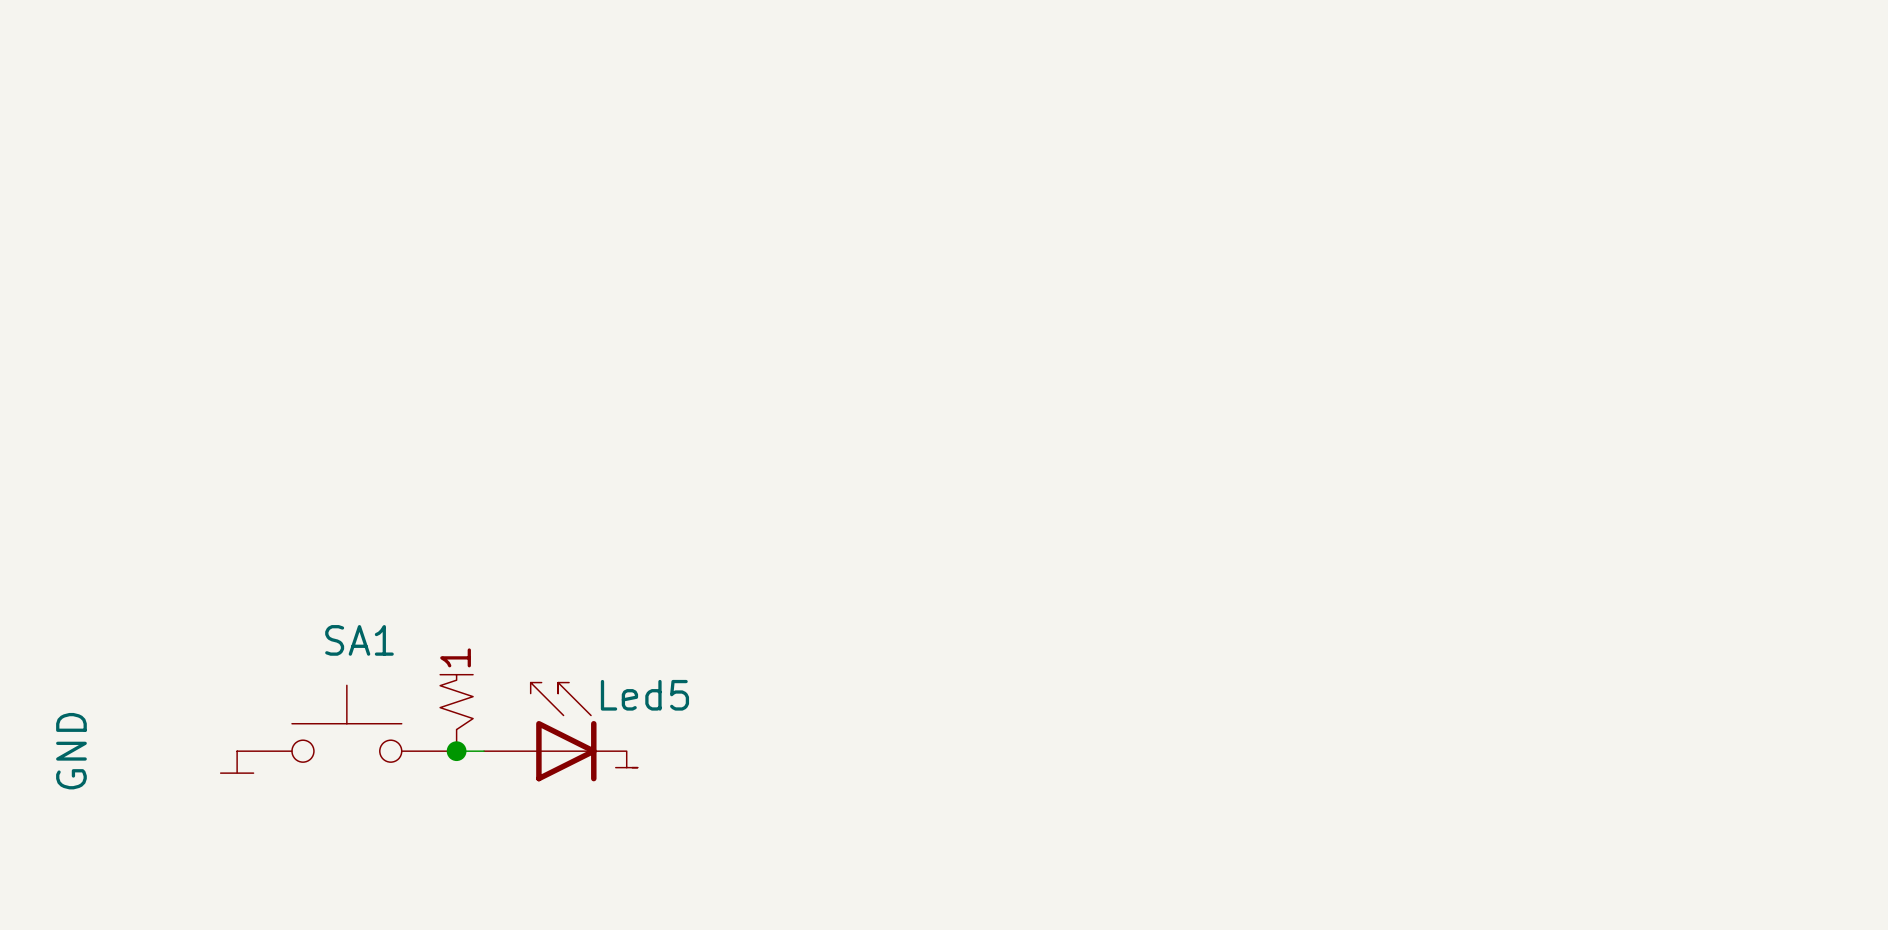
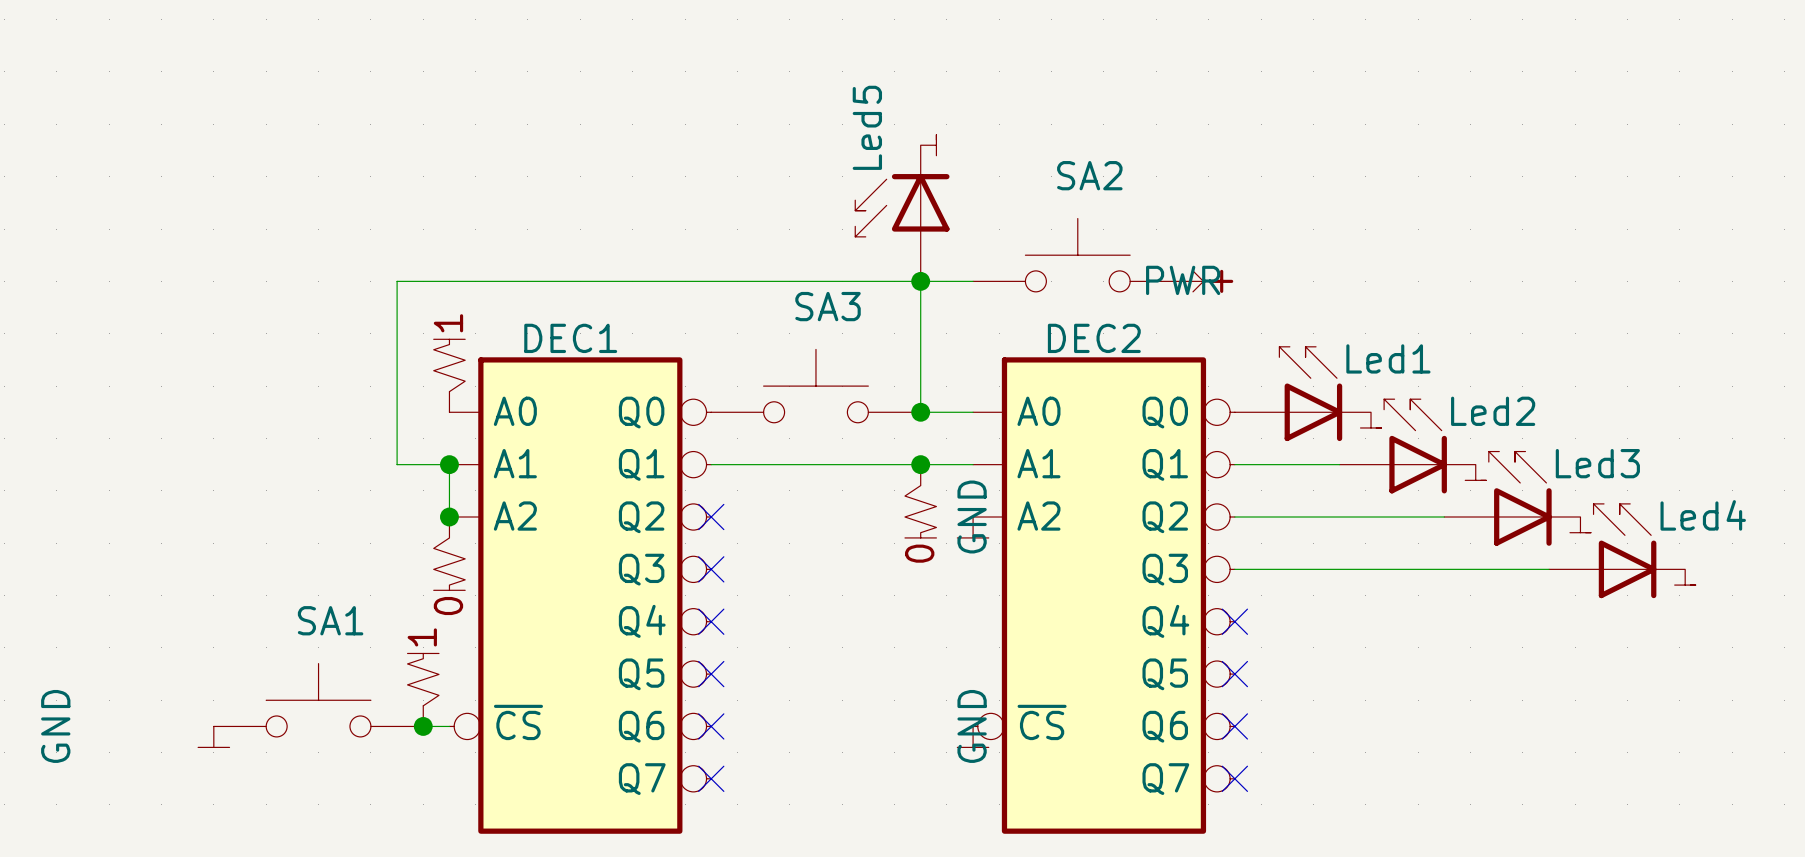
SA2: none -> (1077, 255)
wire: none -> (920, 281) (920, 412) (973, 412)
junction: none -> (920, 281)
wire: none -> (973, 281) (397, 281) (397, 464) (449, 464) (449, 517)
power symbol: none -> PWR (1192, 281)
part: none -> (449, 375)
SA3: none -> (815, 386)
Led1: none -> (1308, 393)
junction: none -> (920, 412)
Led2: none -> (1412, 446)
junction: none -> (449, 464)
wire: none -> (711, 464) (973, 464)
junction: none -> (920, 464)
wire: none -> (1234, 464) (1339, 464)
Led3: none -> (1517, 498)
part: none -> (920, 501)
junction: none -> (449, 517)
no-connect mark: none -> (711, 517)
wire: none -> (1234, 517) (1444, 517)
power symbol: none -> GND (973, 527)
Led4: none -> (1622, 551)
part: none -> (449, 553)
no-connect mark: none -> (711, 569)
wire: none -> (1234, 569) (1549, 569)
DEC1: none -> (580, 595)
DEC2: none -> (1103, 595)
no-connect mark: none -> (711, 621)
no-connect mark: none -> (1234, 621)
no-connect mark: none -> (711, 674)
no-connect mark: none -> (1234, 674)
Led5 position: (560, 731) -> (902, 208)
Led5 rotation: 0° (584, 731) -> 90° counterclockwise (902, 185)
no-connect mark: none -> (711, 726)
no-connect mark: none -> (1234, 726)
power symbol: none -> GND (973, 736)
no-connect mark: none -> (711, 778)
no-connect mark: none -> (1234, 778)

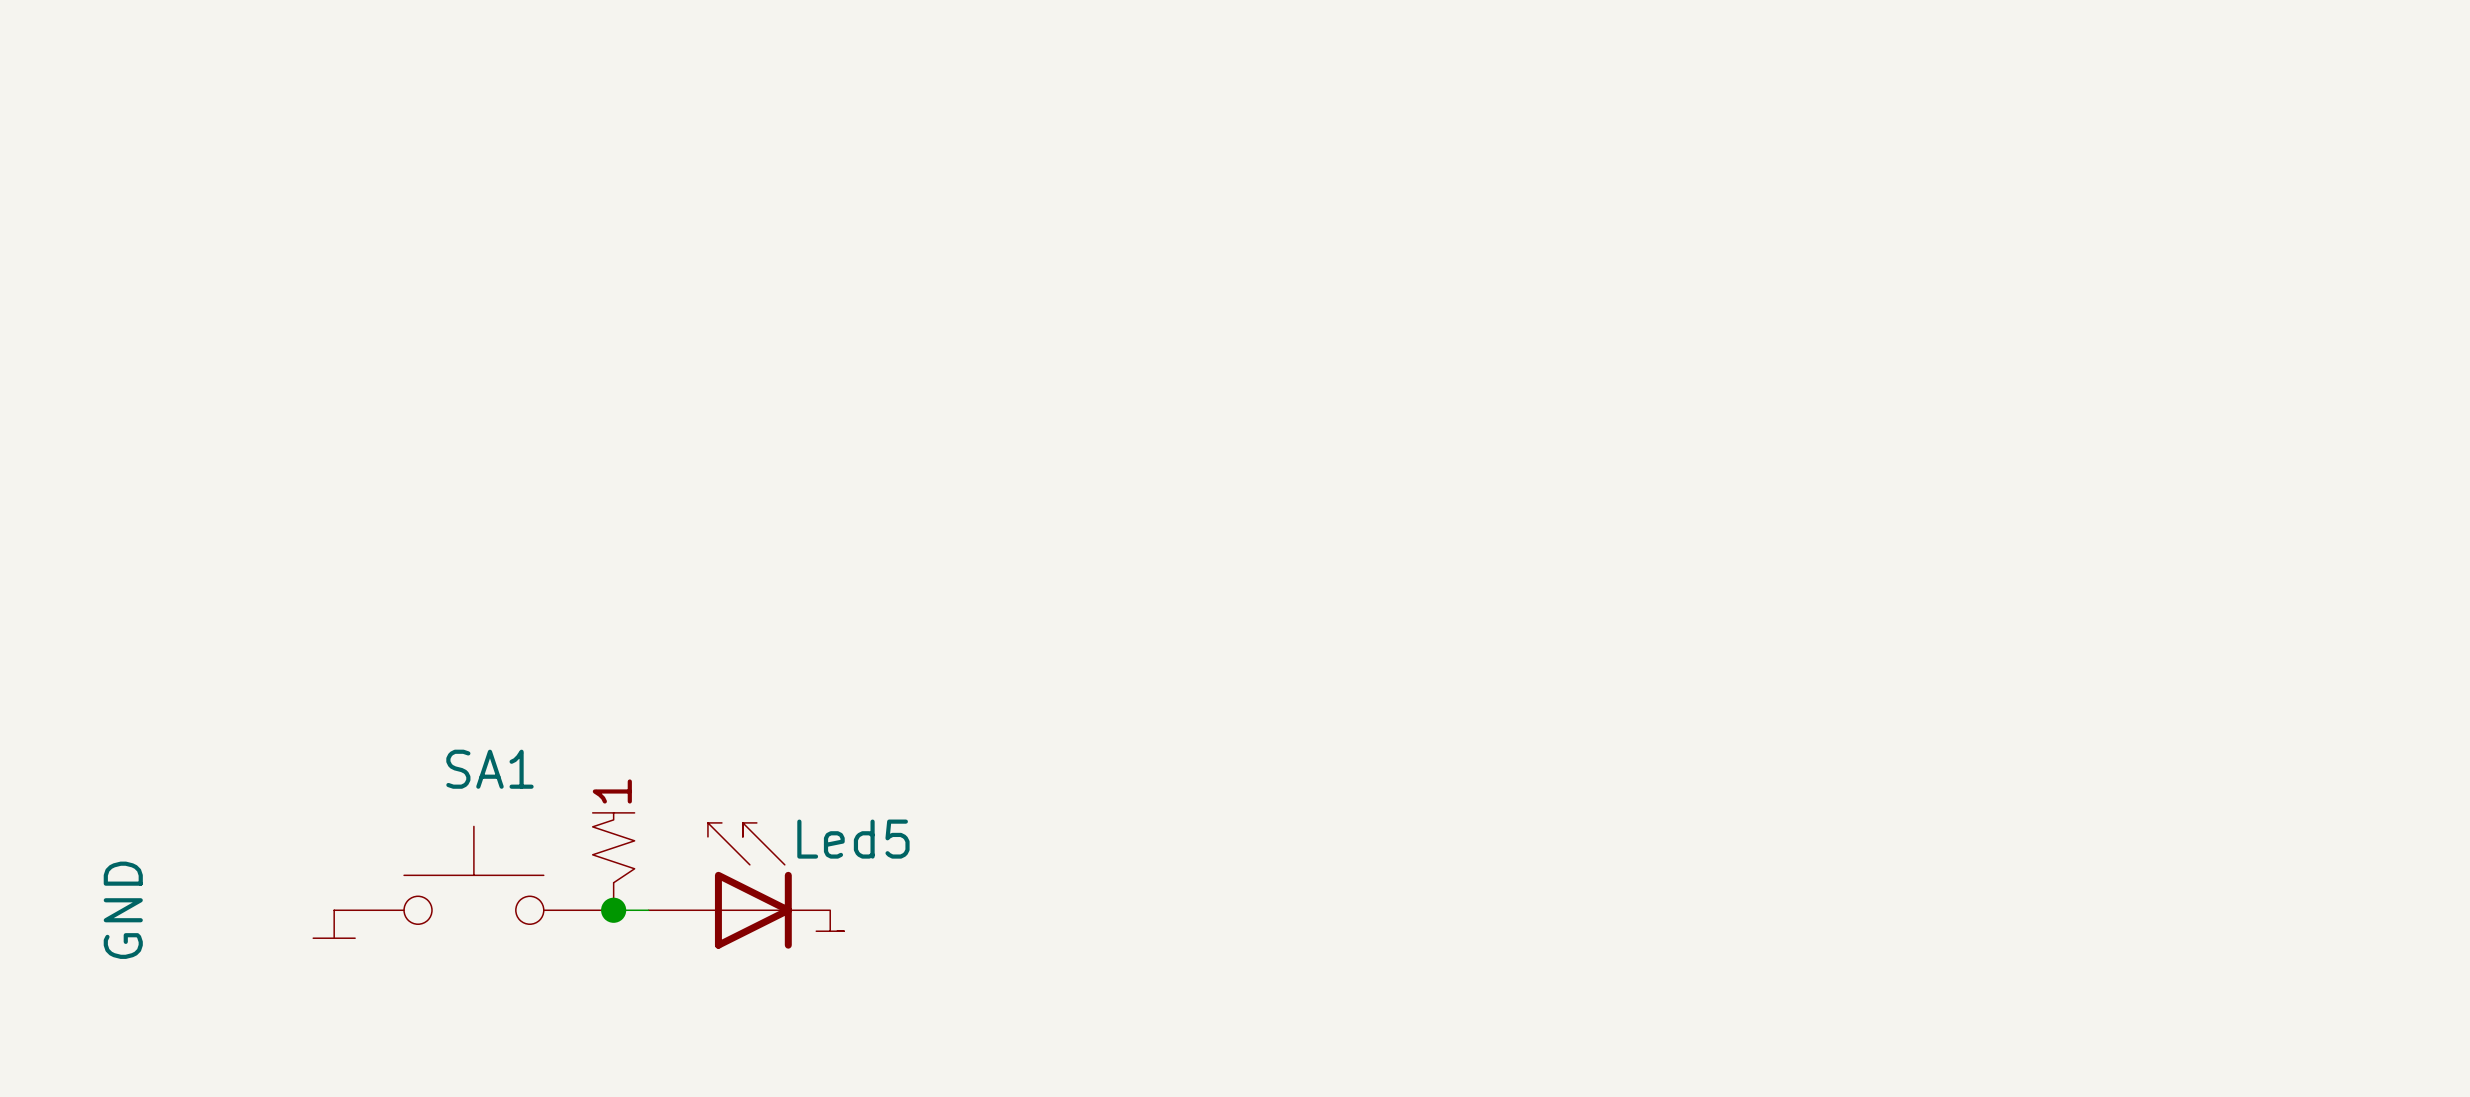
Led5 rotation: 0° (902, 185) -> 90° clockwise (776, 885)
Led5 position: (902, 208) -> (746, 885)
SA2: (1077, 255) -> none
wire: (920, 281) (920, 412) (973, 412) -> none
junction: (920, 281) -> none
wire: (973, 281) (397, 281) (397, 464) (449, 464) (449, 517) -> none
power symbol: PWR (1192, 281) -> none
part: (449, 375) -> none
SA3: (815, 386) -> none
Led1: (1308, 393) -> none
junction: (920, 412) -> none
Led2: (1412, 446) -> none
junction: (449, 464) -> none
wire: (711, 464) (973, 464) -> none
junction: (920, 464) -> none
wire: (1234, 464) (1339, 464) -> none
Led3: (1517, 498) -> none
part: (920, 501) -> none
junction: (449, 517) -> none
no-connect mark: (711, 517) -> none
wire: (1234, 517) (1444, 517) -> none
power symbol: GND (973, 527) -> none
Led4: (1622, 551) -> none
part: (449, 553) -> none
no-connect mark: (711, 569) -> none
wire: (1234, 569) (1549, 569) -> none
DEC1: (580, 595) -> none
DEC2: (1103, 595) -> none
no-connect mark: (711, 621) -> none
no-connect mark: (1234, 621) -> none
no-connect mark: (711, 674) -> none
no-connect mark: (1234, 674) -> none
no-connect mark: (711, 726) -> none
no-connect mark: (1234, 726) -> none
power symbol: GND (973, 736) -> none
no-connect mark: (711, 778) -> none
no-connect mark: (1234, 778) -> none

